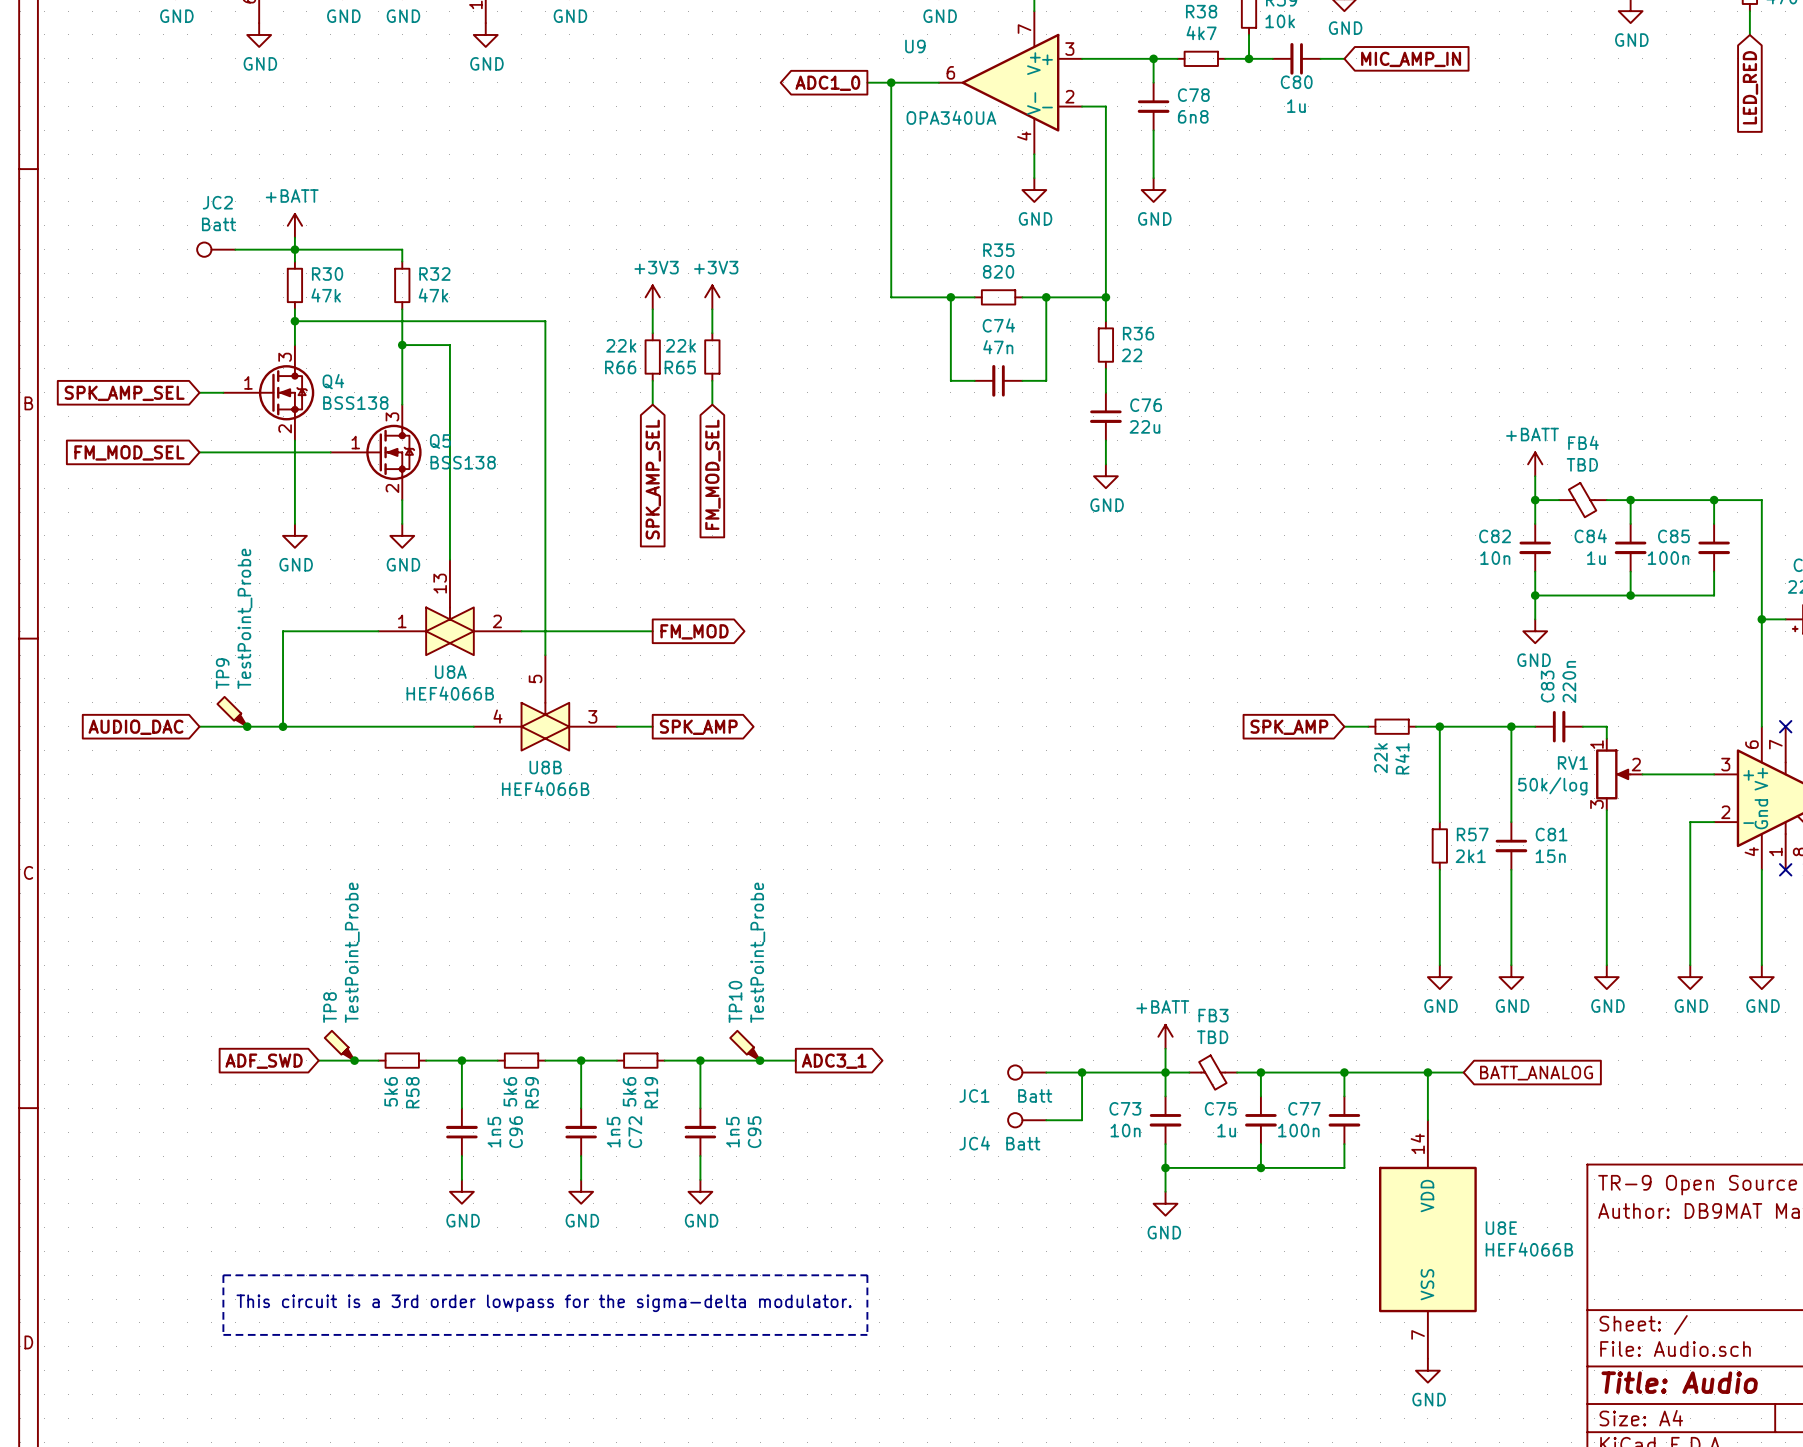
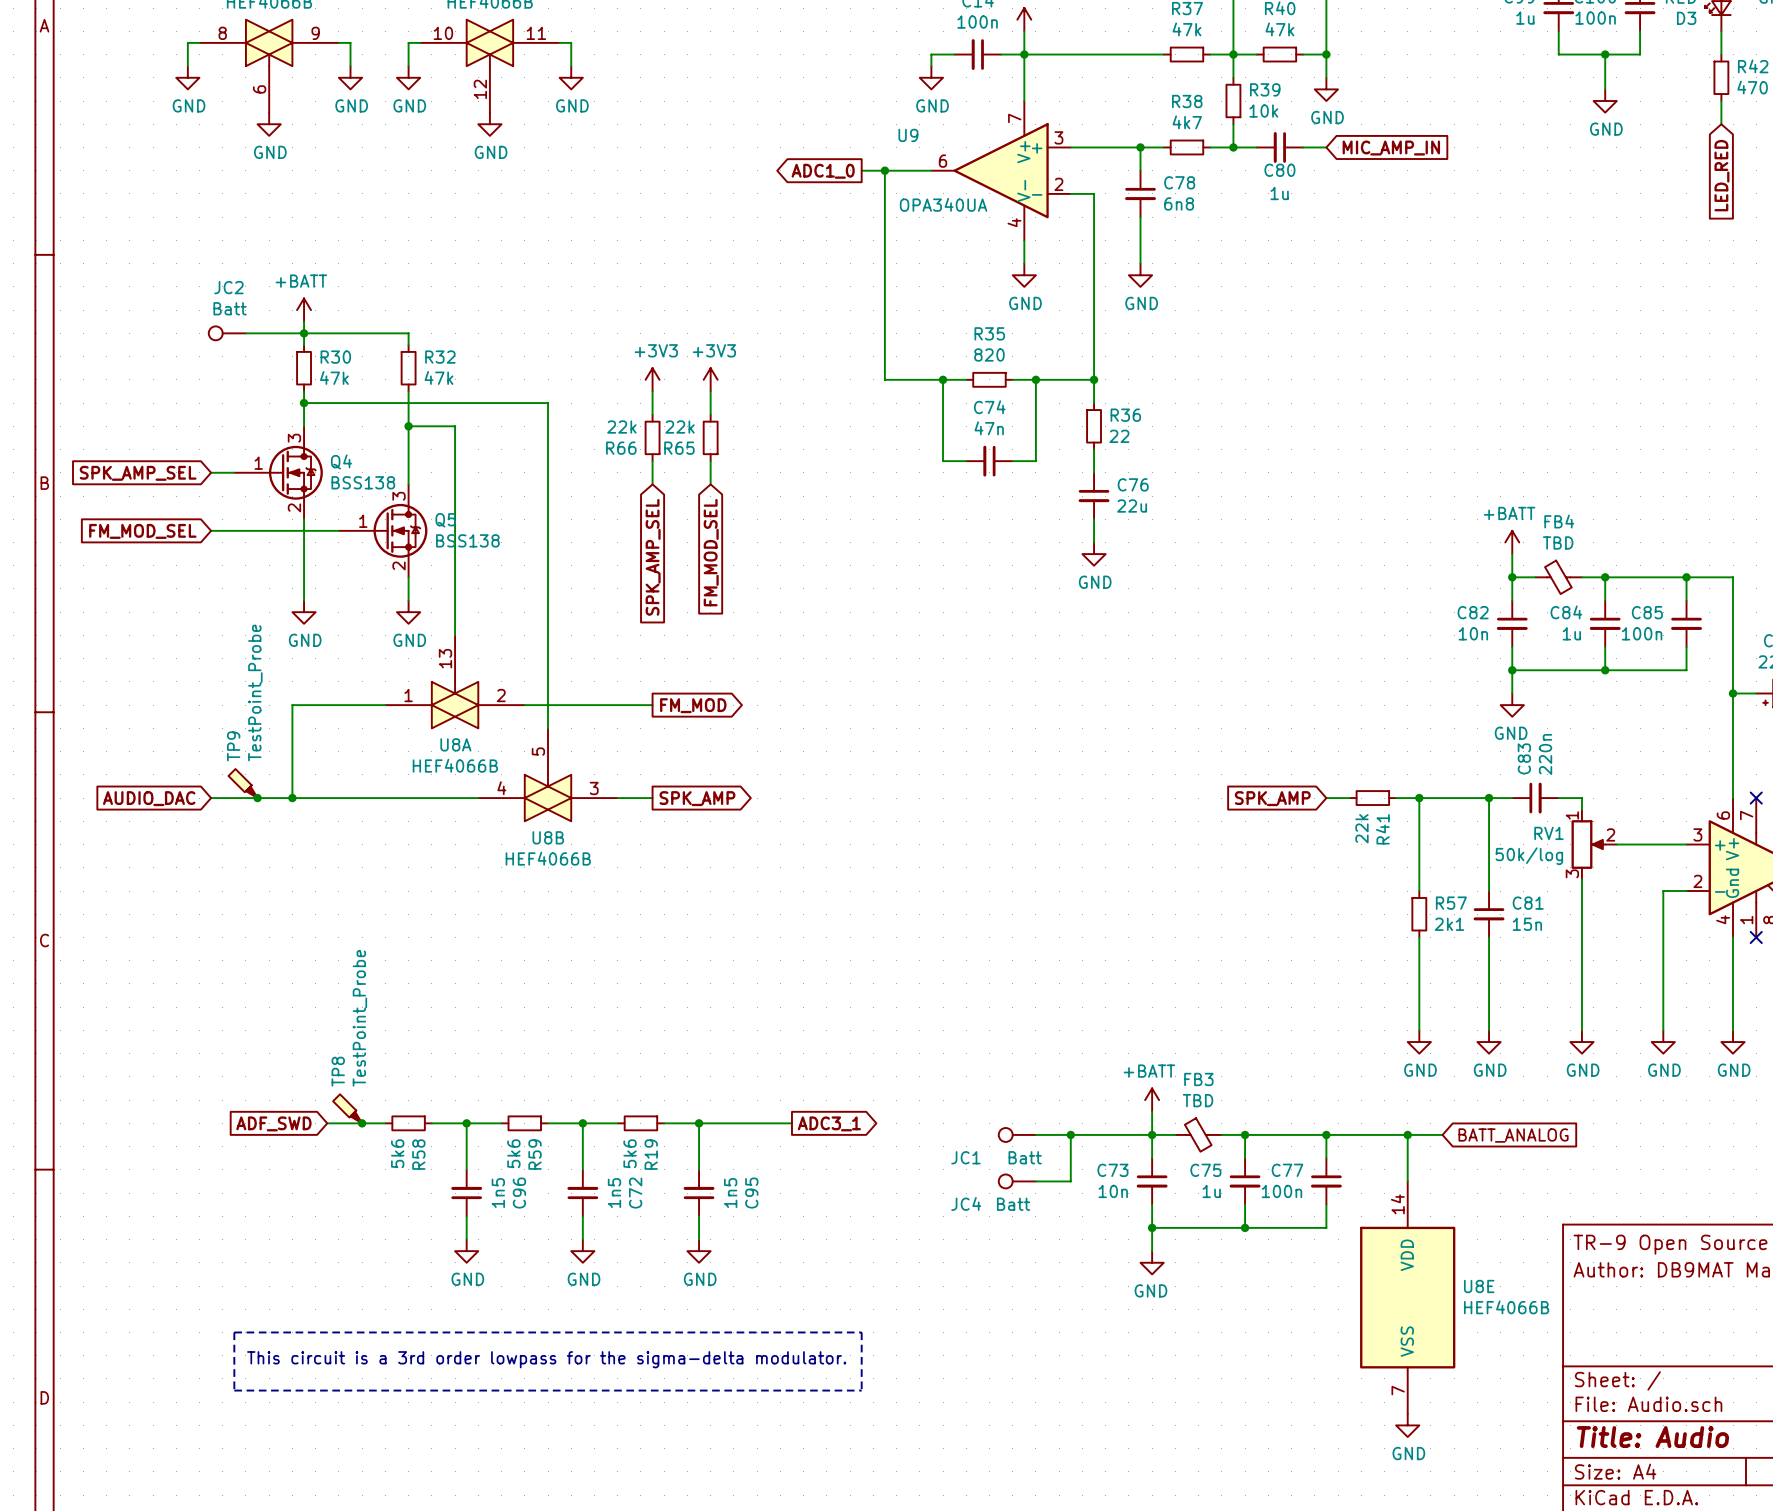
TP10: TestPoint_Probe (745, 1045) -> none
junction: (760, 1060) -> none

